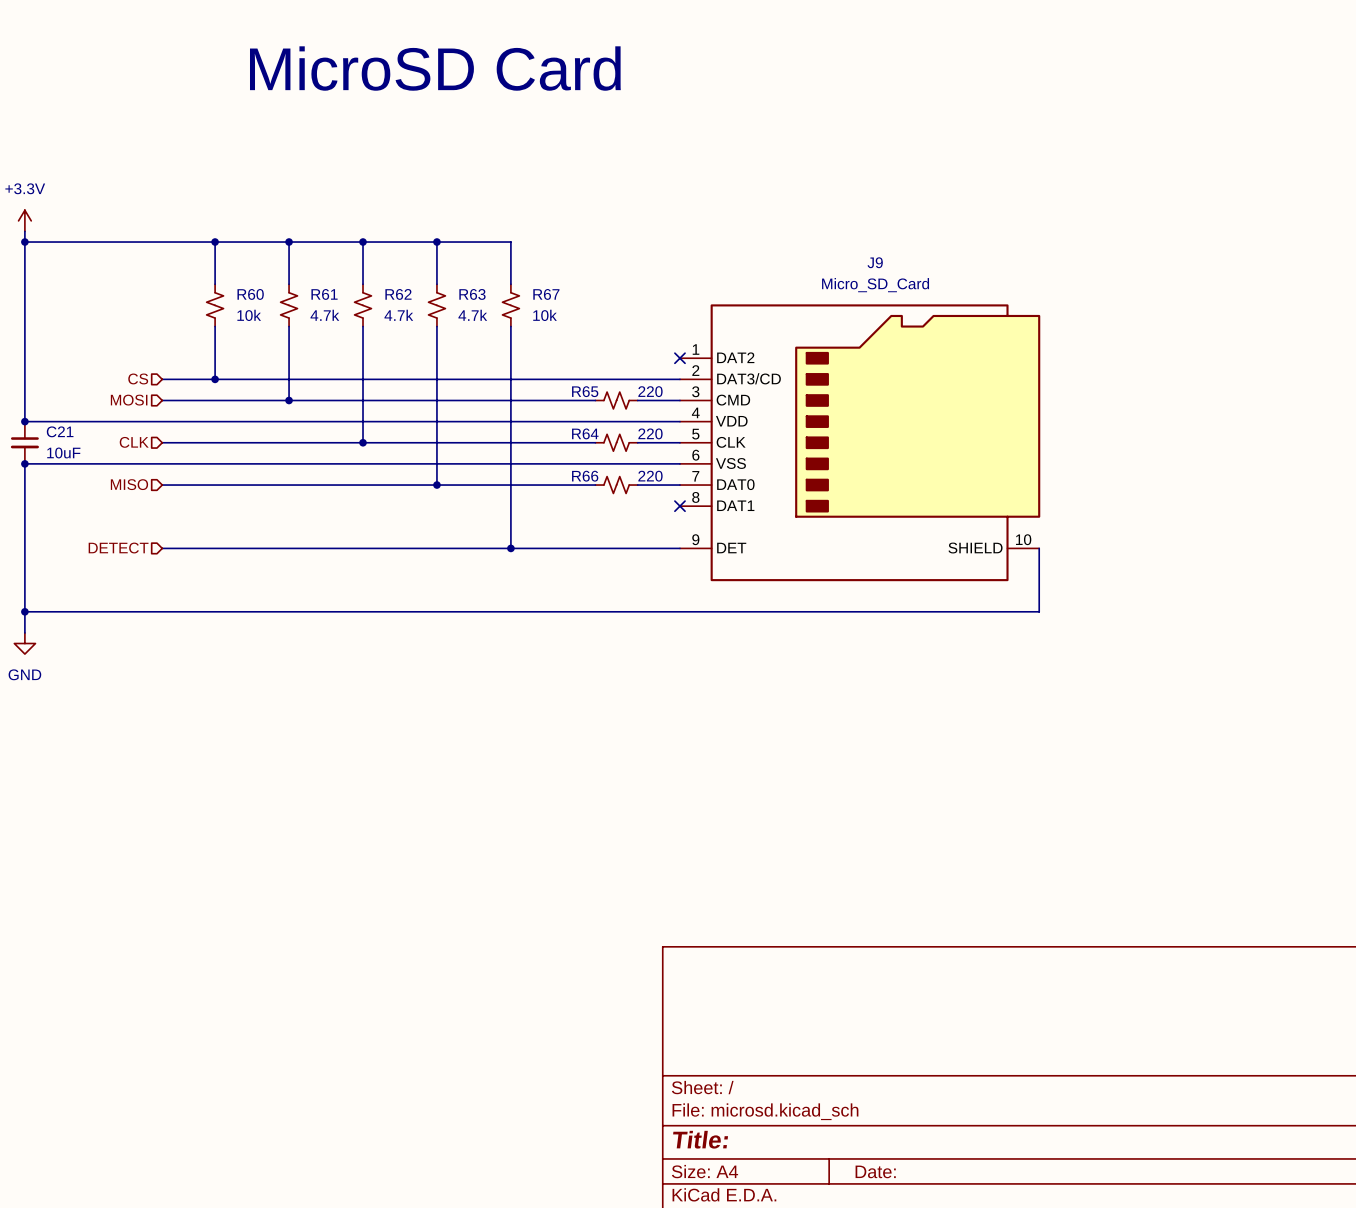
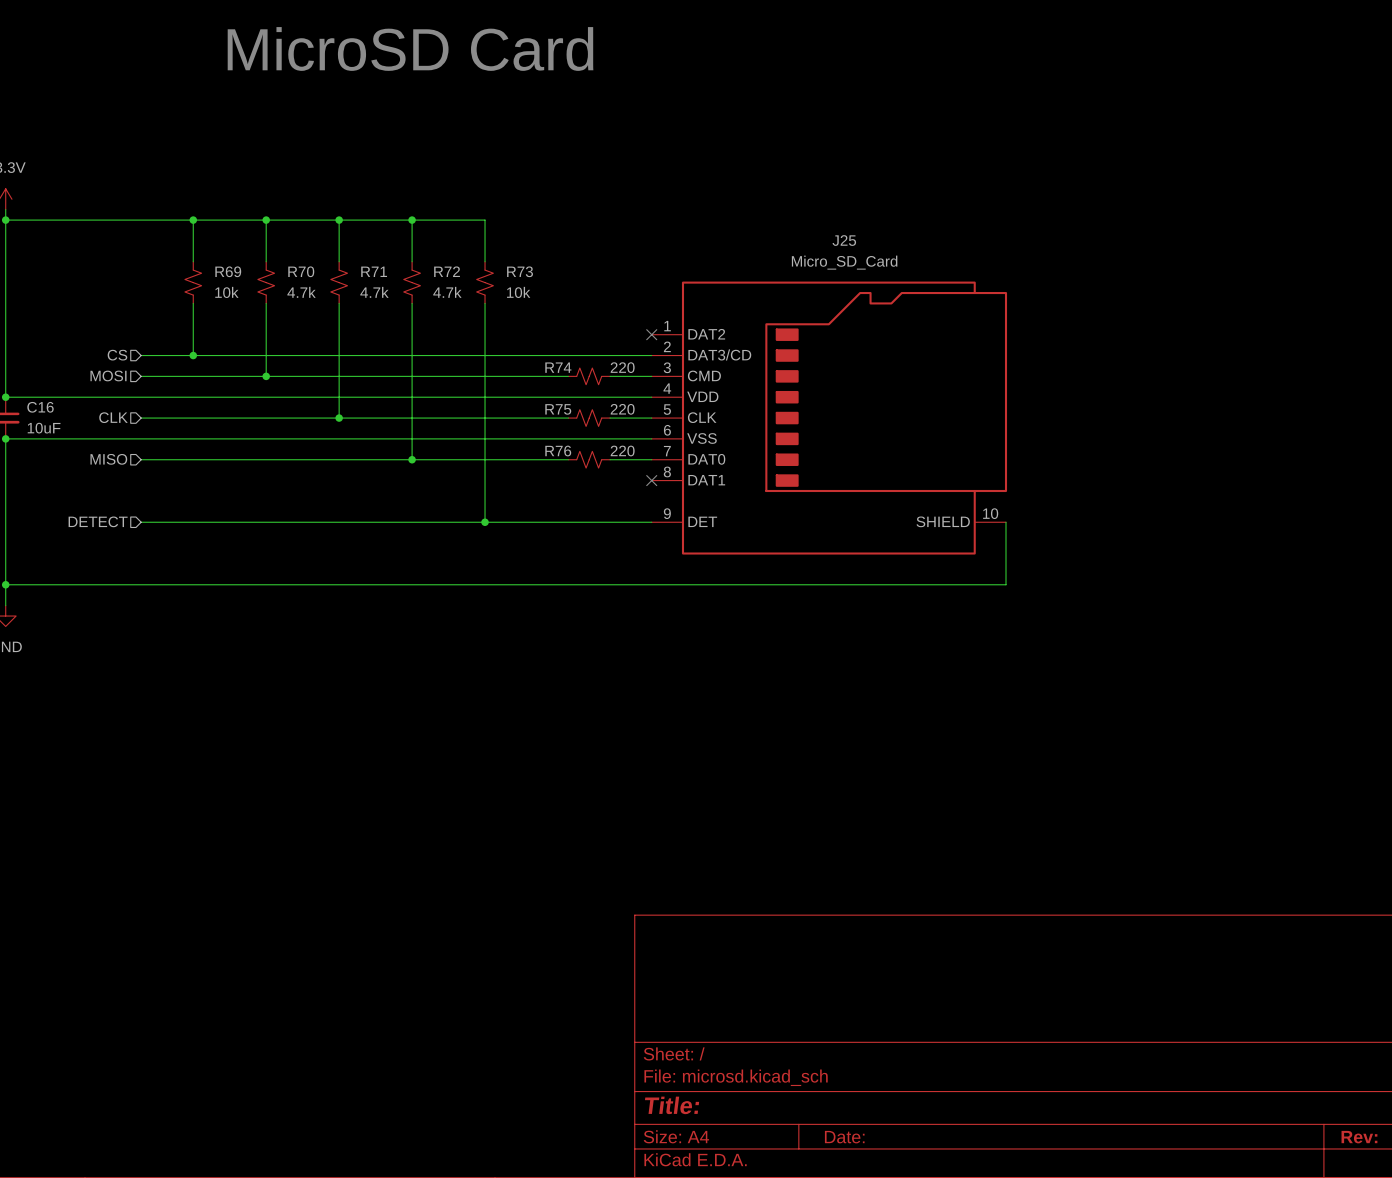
J9 name: J9 (875, 262) -> J25 (844, 240)
R60 name: R60 (250, 294) -> R69 (228, 271)
R61 name: R61 (324, 294) -> R70 (301, 271)
R62 name: R62 (398, 294) -> R71 (374, 271)
R63 name: R63 (472, 294) -> R72 (447, 271)
R67 name: R67 (546, 294) -> R73 (520, 271)
R65 name: R65 (585, 391) -> R74 (558, 367)
C21 name: C21 (60, 431) -> C16 (40, 407)
R64 name: R64 (585, 433) -> R75 (558, 409)
R66 name: R66 (585, 476) -> R76 (558, 451)

